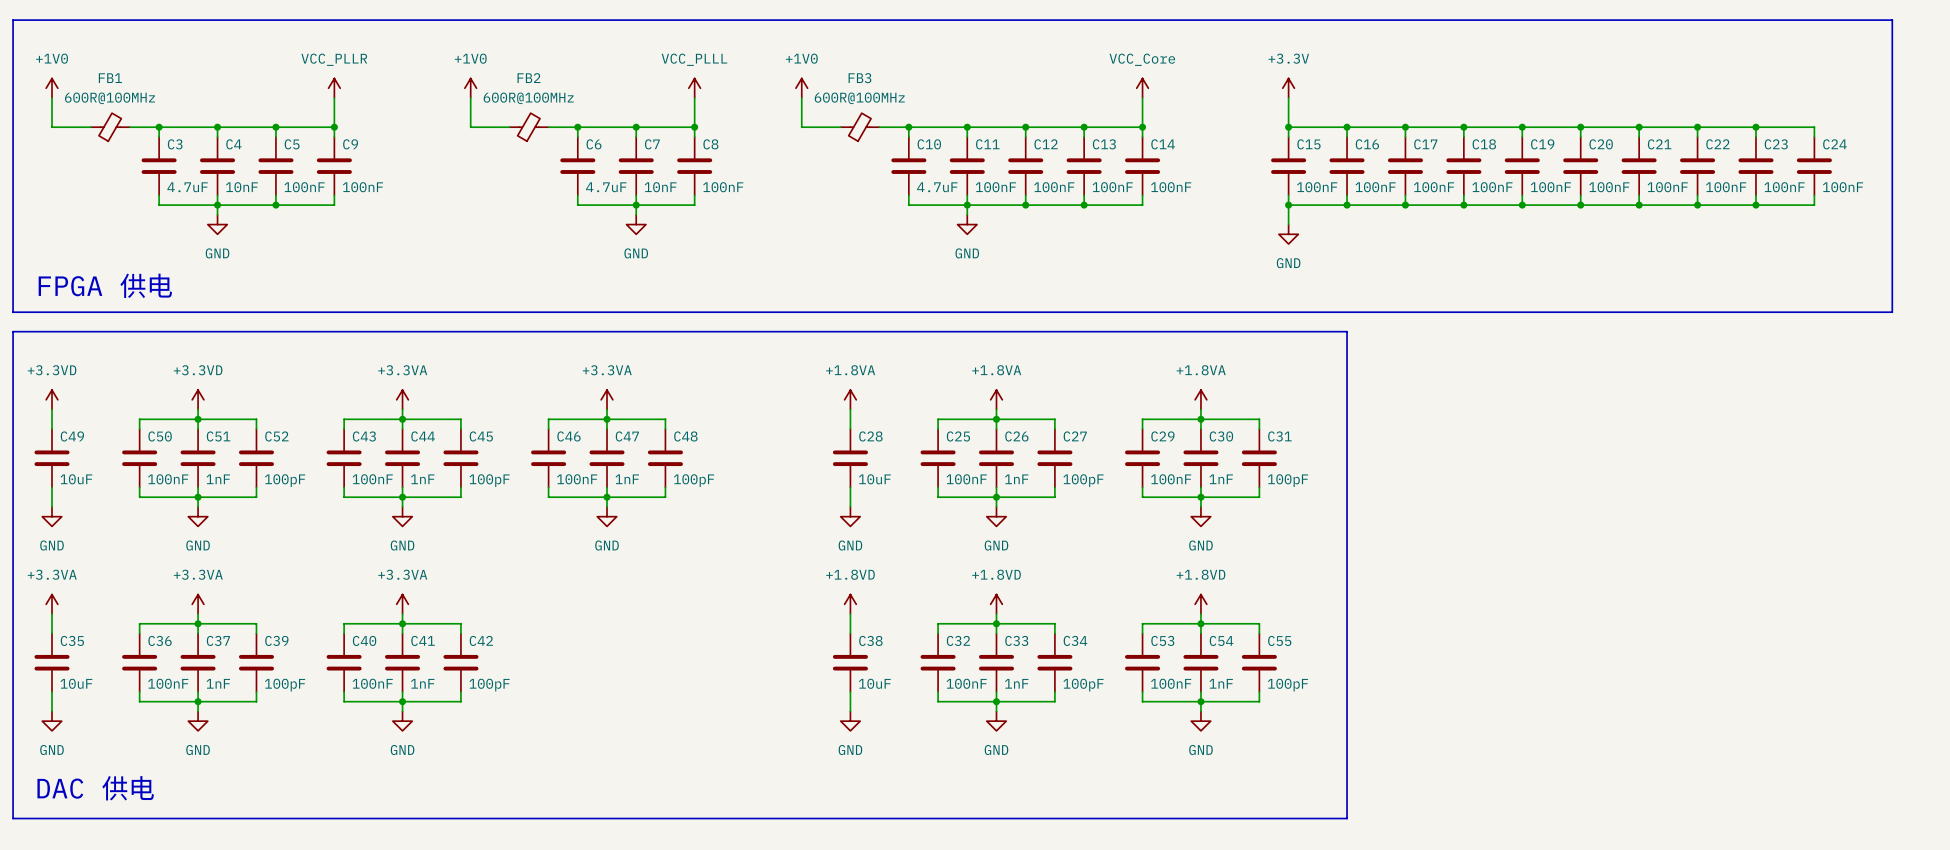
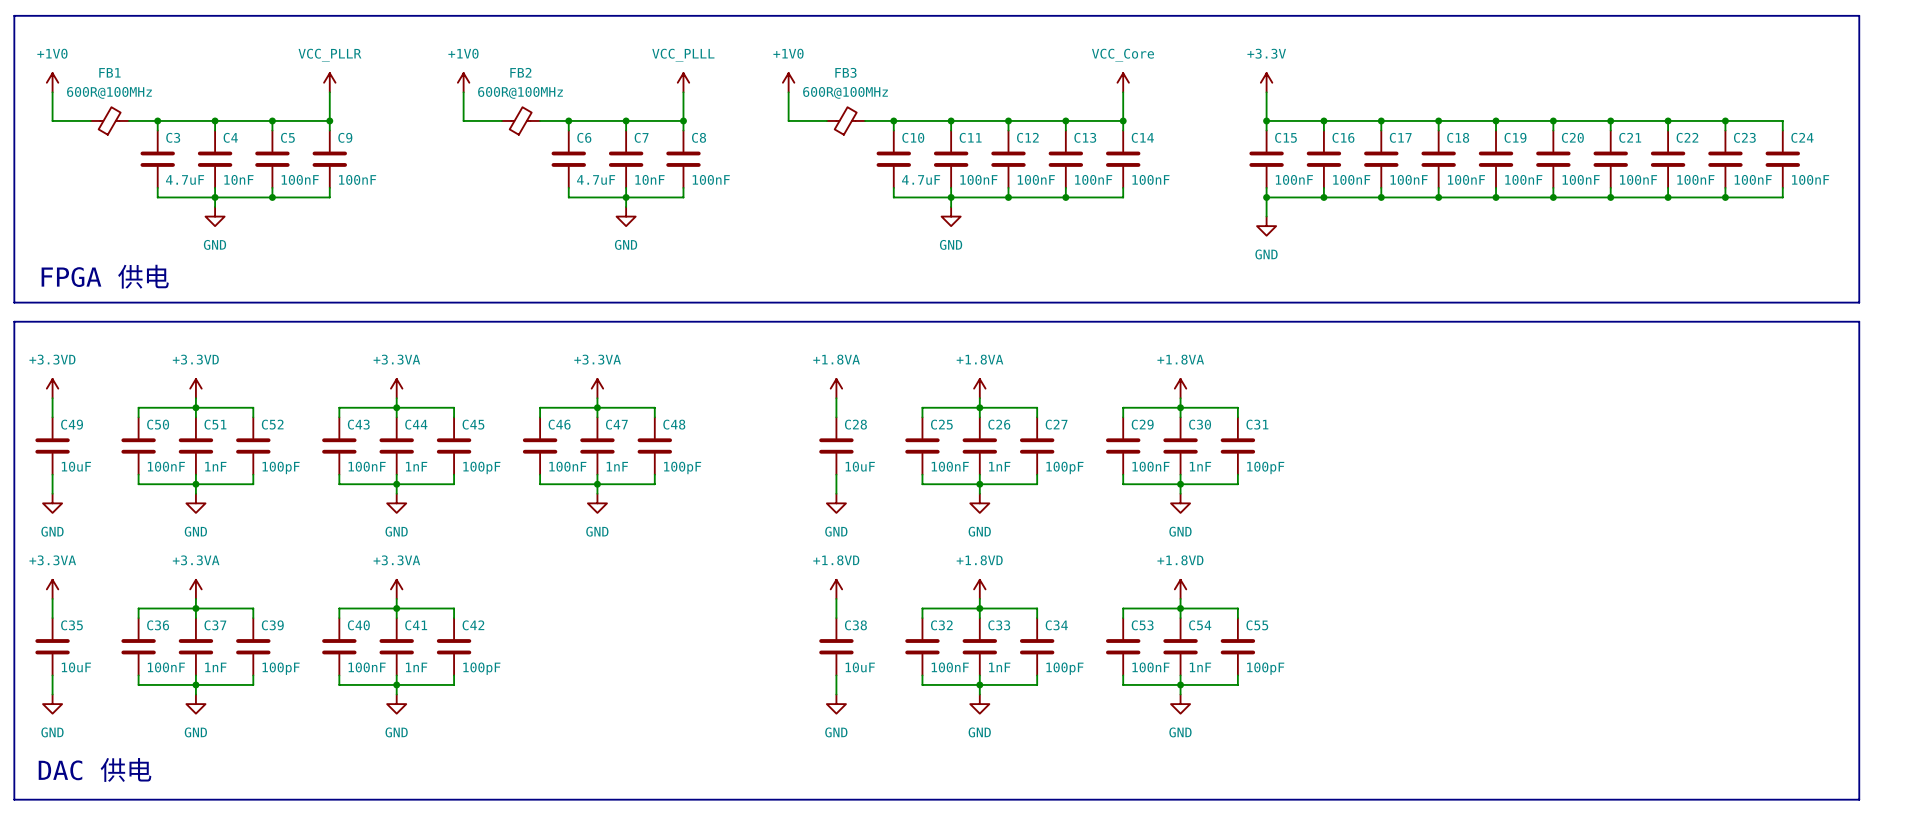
line: (1347, 331) (1347, 818) -> (1323, 321) (1859, 321) (1859, 799) (1323, 799)

